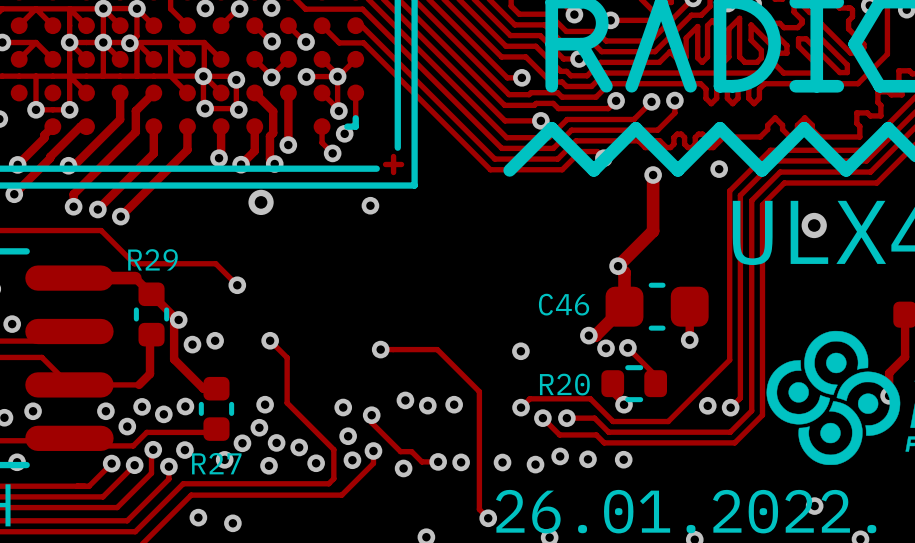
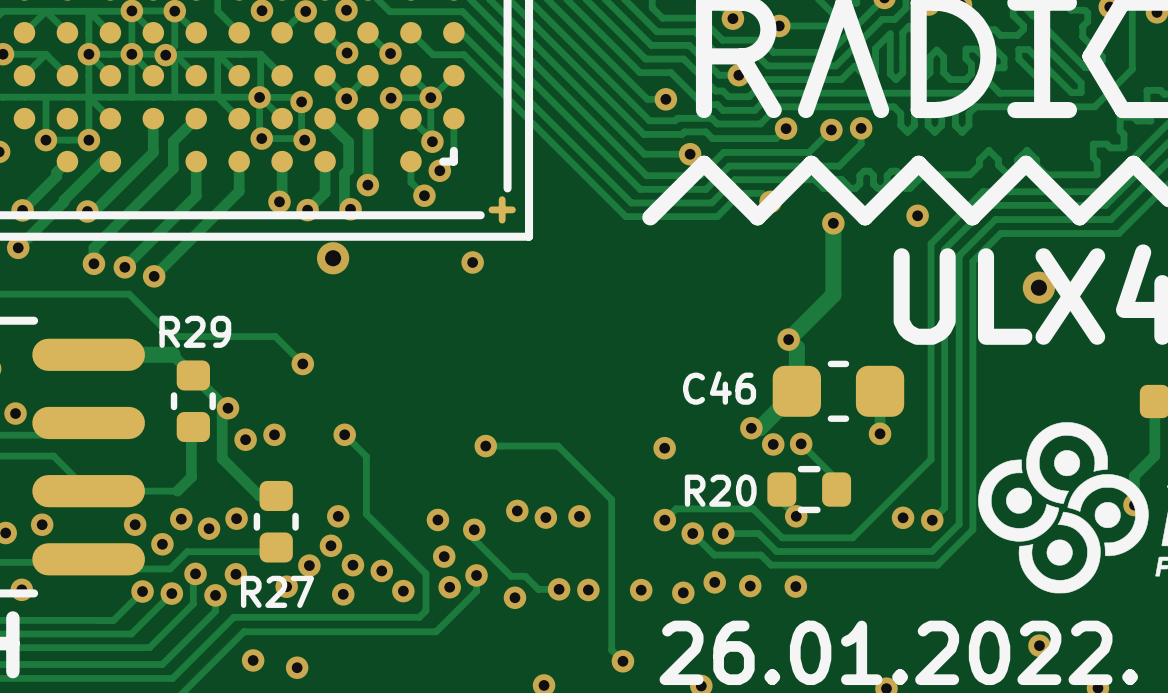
track: (764, 38) (751, 24) (751, 40) (757, 46) -> (975, 49) (965, 49) (965, 58)
track: (728, 44) (728, 28) (739, 18) (739, 44) -> (930, 56) (936, 50) (943, 56)

